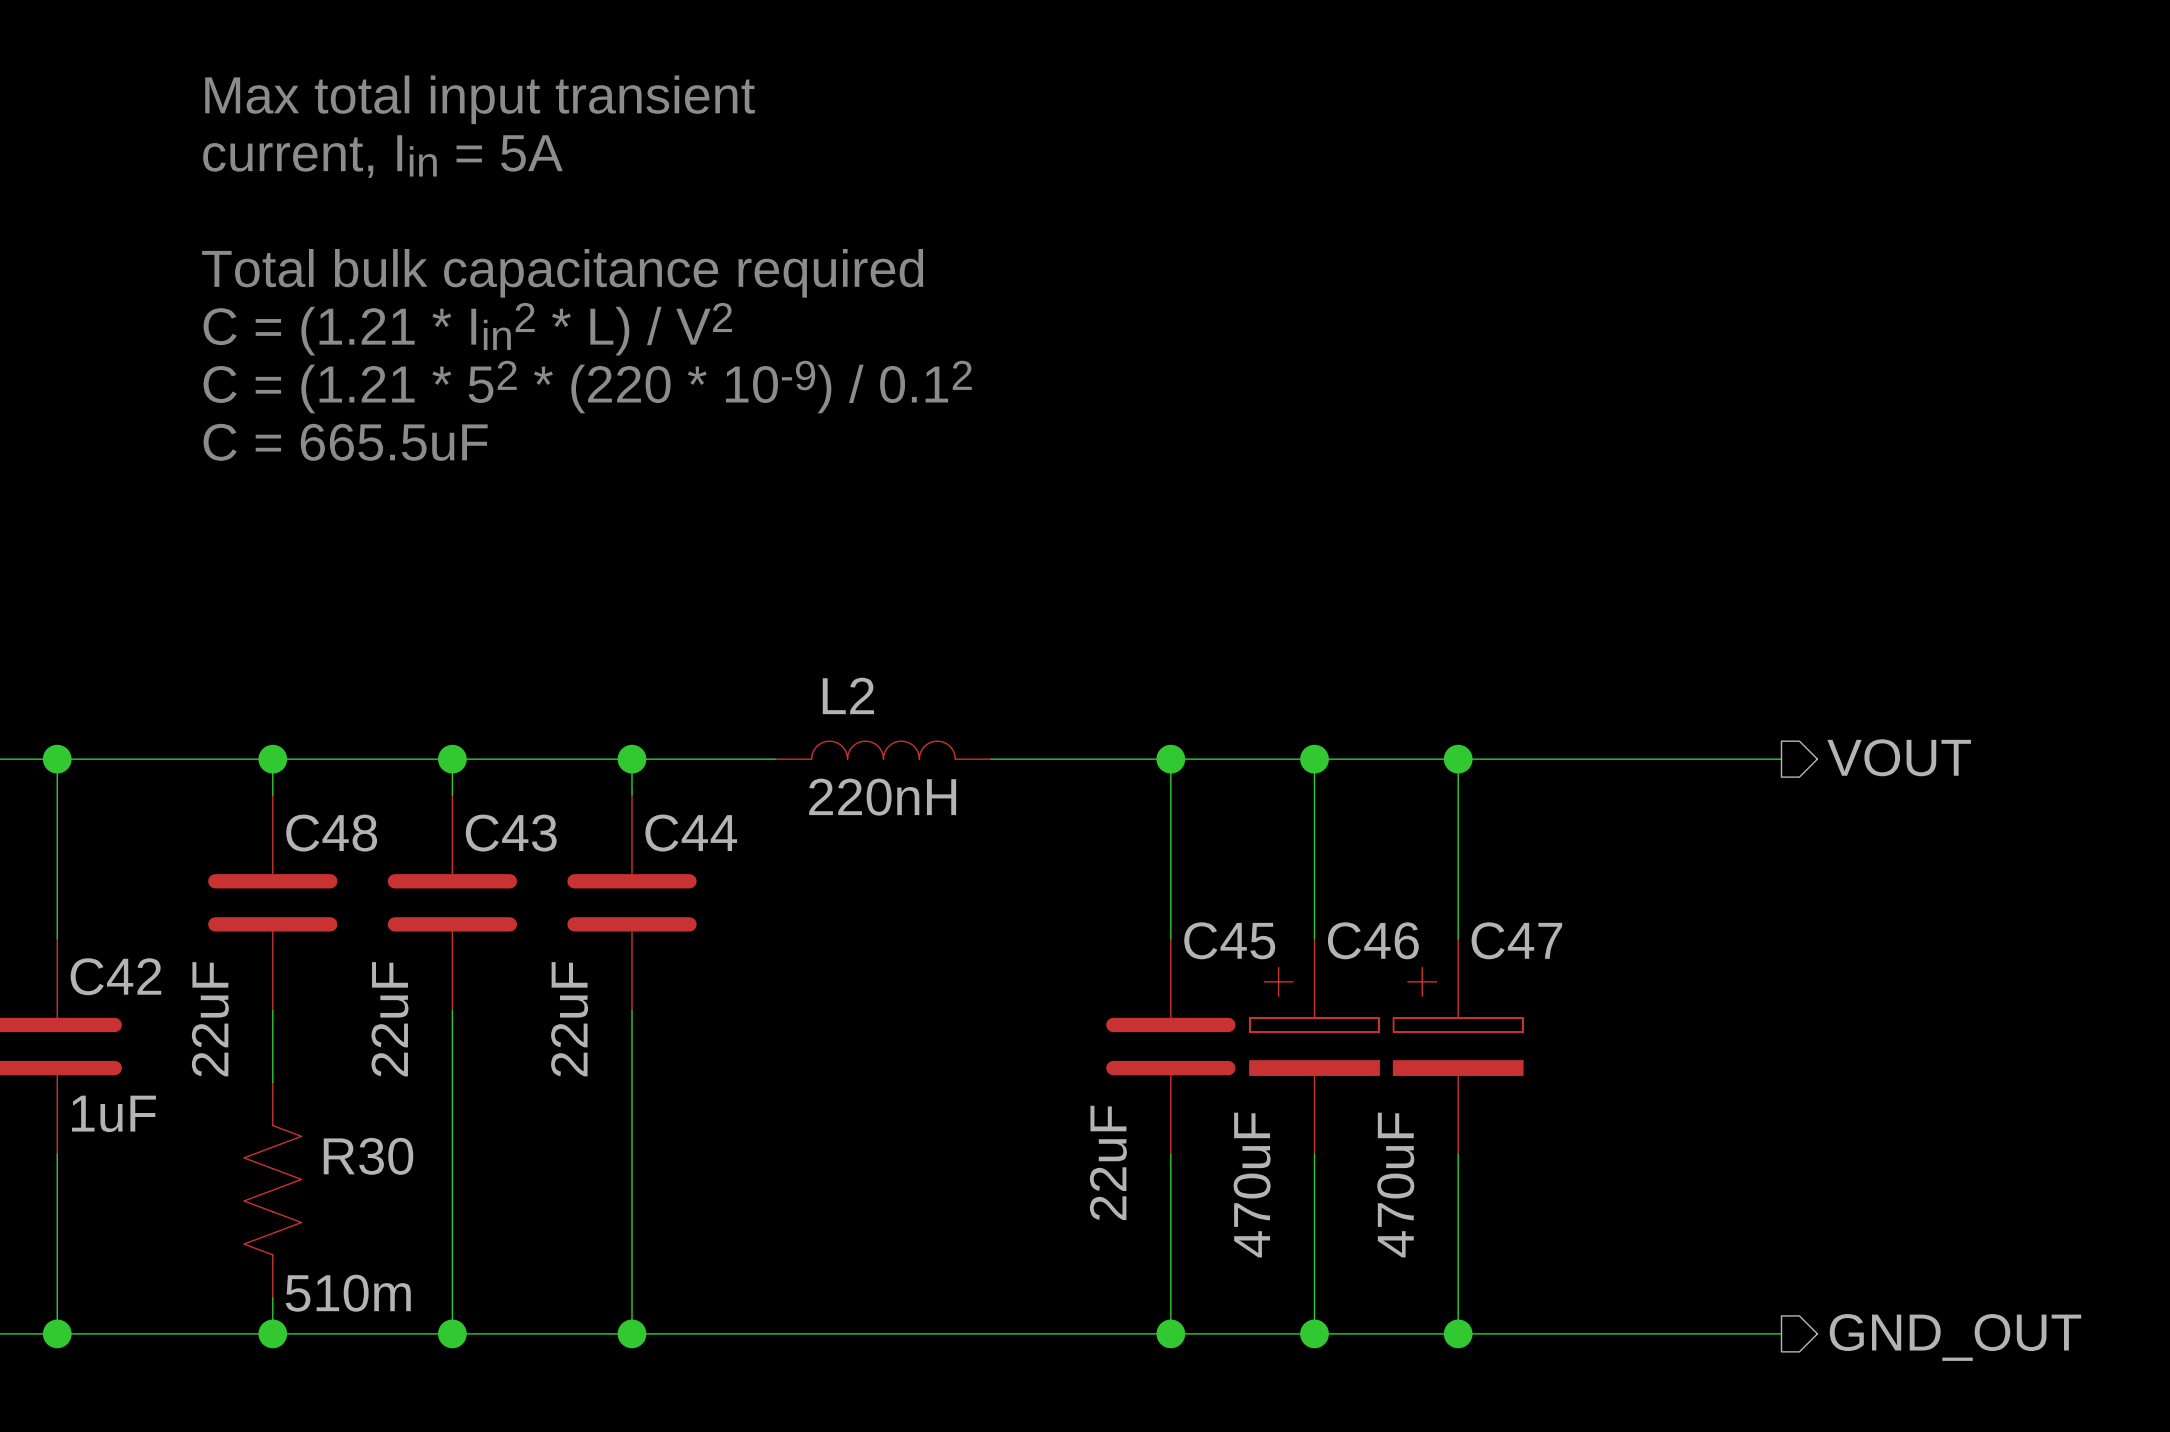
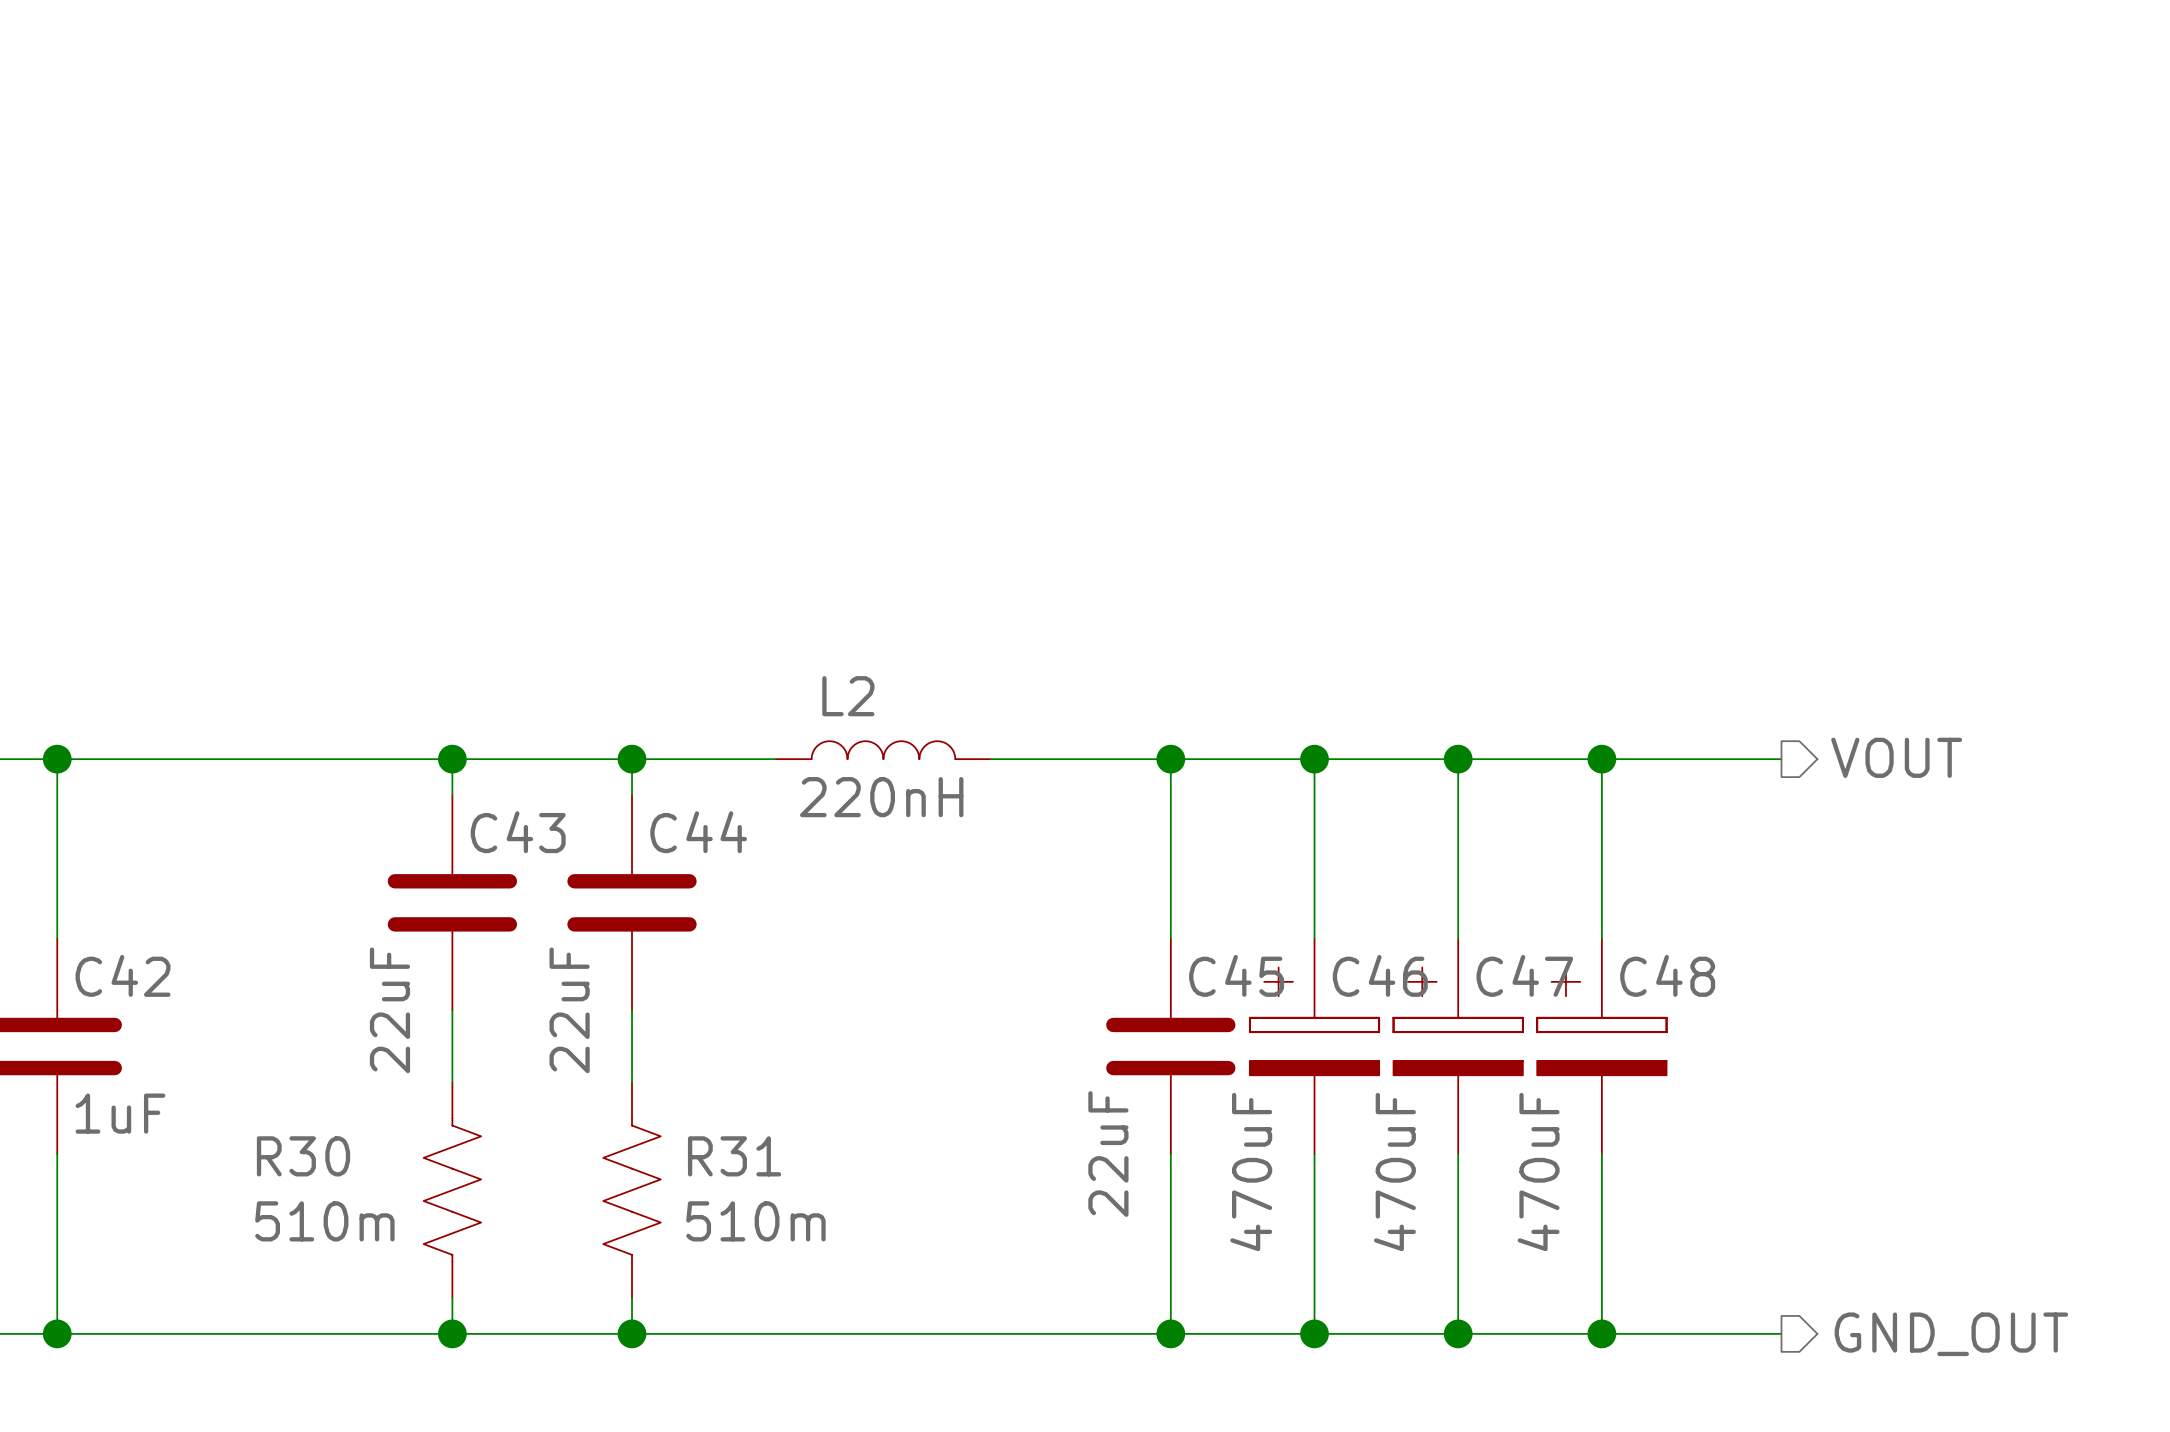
text: Max total input transient (480, 99) -> none
text: current, Iin = 5A (382, 156) -> none
text: Total bulk capacitance required (562, 273) -> none
text: C = (1.21 * Iin2 * L) / V2 (467, 329) -> none
text: C = (1.21 * 52 * (220 * 10-9) / 0.12 (587, 387) -> none
text: C = 665.5uF (345, 442) -> none
wire: (272, 759) (272, 795) -> none
junction: (272, 759) -> none
wire: none -> (1601, 759) (1601, 938)
junction: none -> (1601, 759)
C48 symbol: [208, 795, 338, 1011] -> [1537, 938, 1667, 1155]
C45 name position: C45 (1229, 940) -> C45 (1236, 975)
C46 name position: C46 (1373, 940) -> C46 (1380, 975)
C47 name position: C47 (1516, 940) -> C47 (1524, 975)
wire: (272, 1010) (272, 1082) -> none
C48 text: 22uF (210, 1019) -> 470uF (1538, 1171)
wire: (452, 1082) (452, 1297) -> none
wire: (632, 1082) (632, 1297) -> none
wire: none -> (1601, 1154) (1601, 1333)
R30 name position: R30 (368, 1156) -> R30 (303, 1156)
R30 position: (272, 1190) -> (452, 1190)
R31: none -> (632, 1190)
R30 text position: 510m (348, 1293) -> 510m (324, 1221)
wire: (272, 1297) (272, 1333) -> none
junction: (272, 1333) -> none
junction: none -> (1601, 1333)

